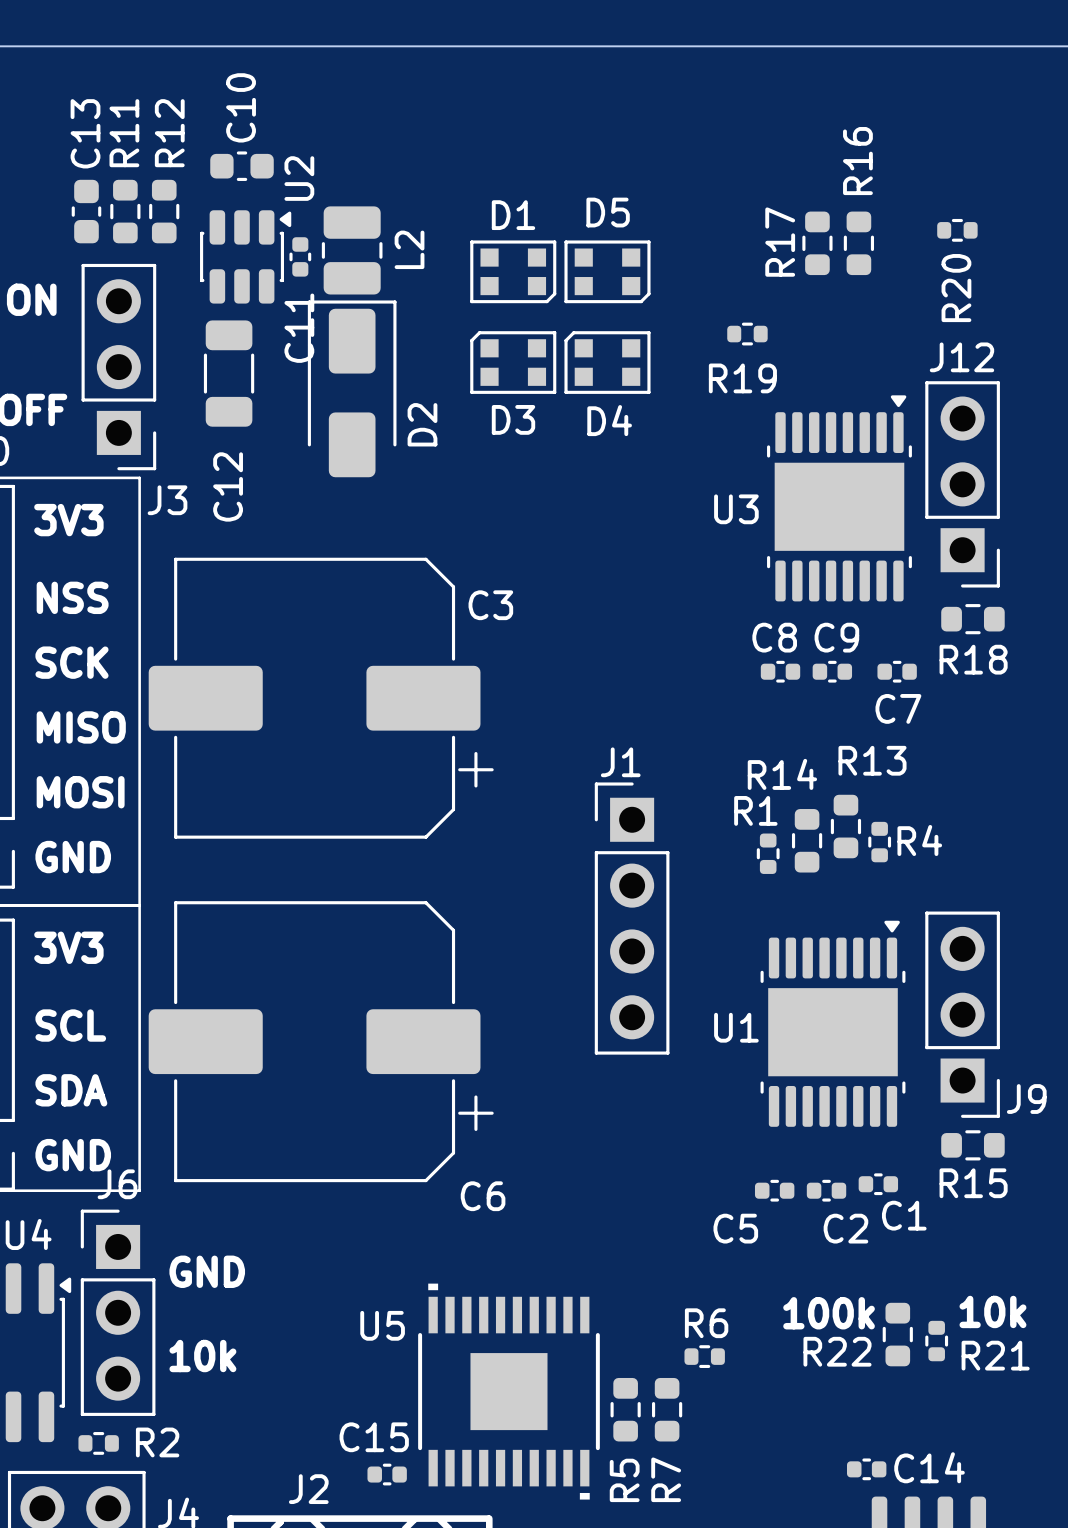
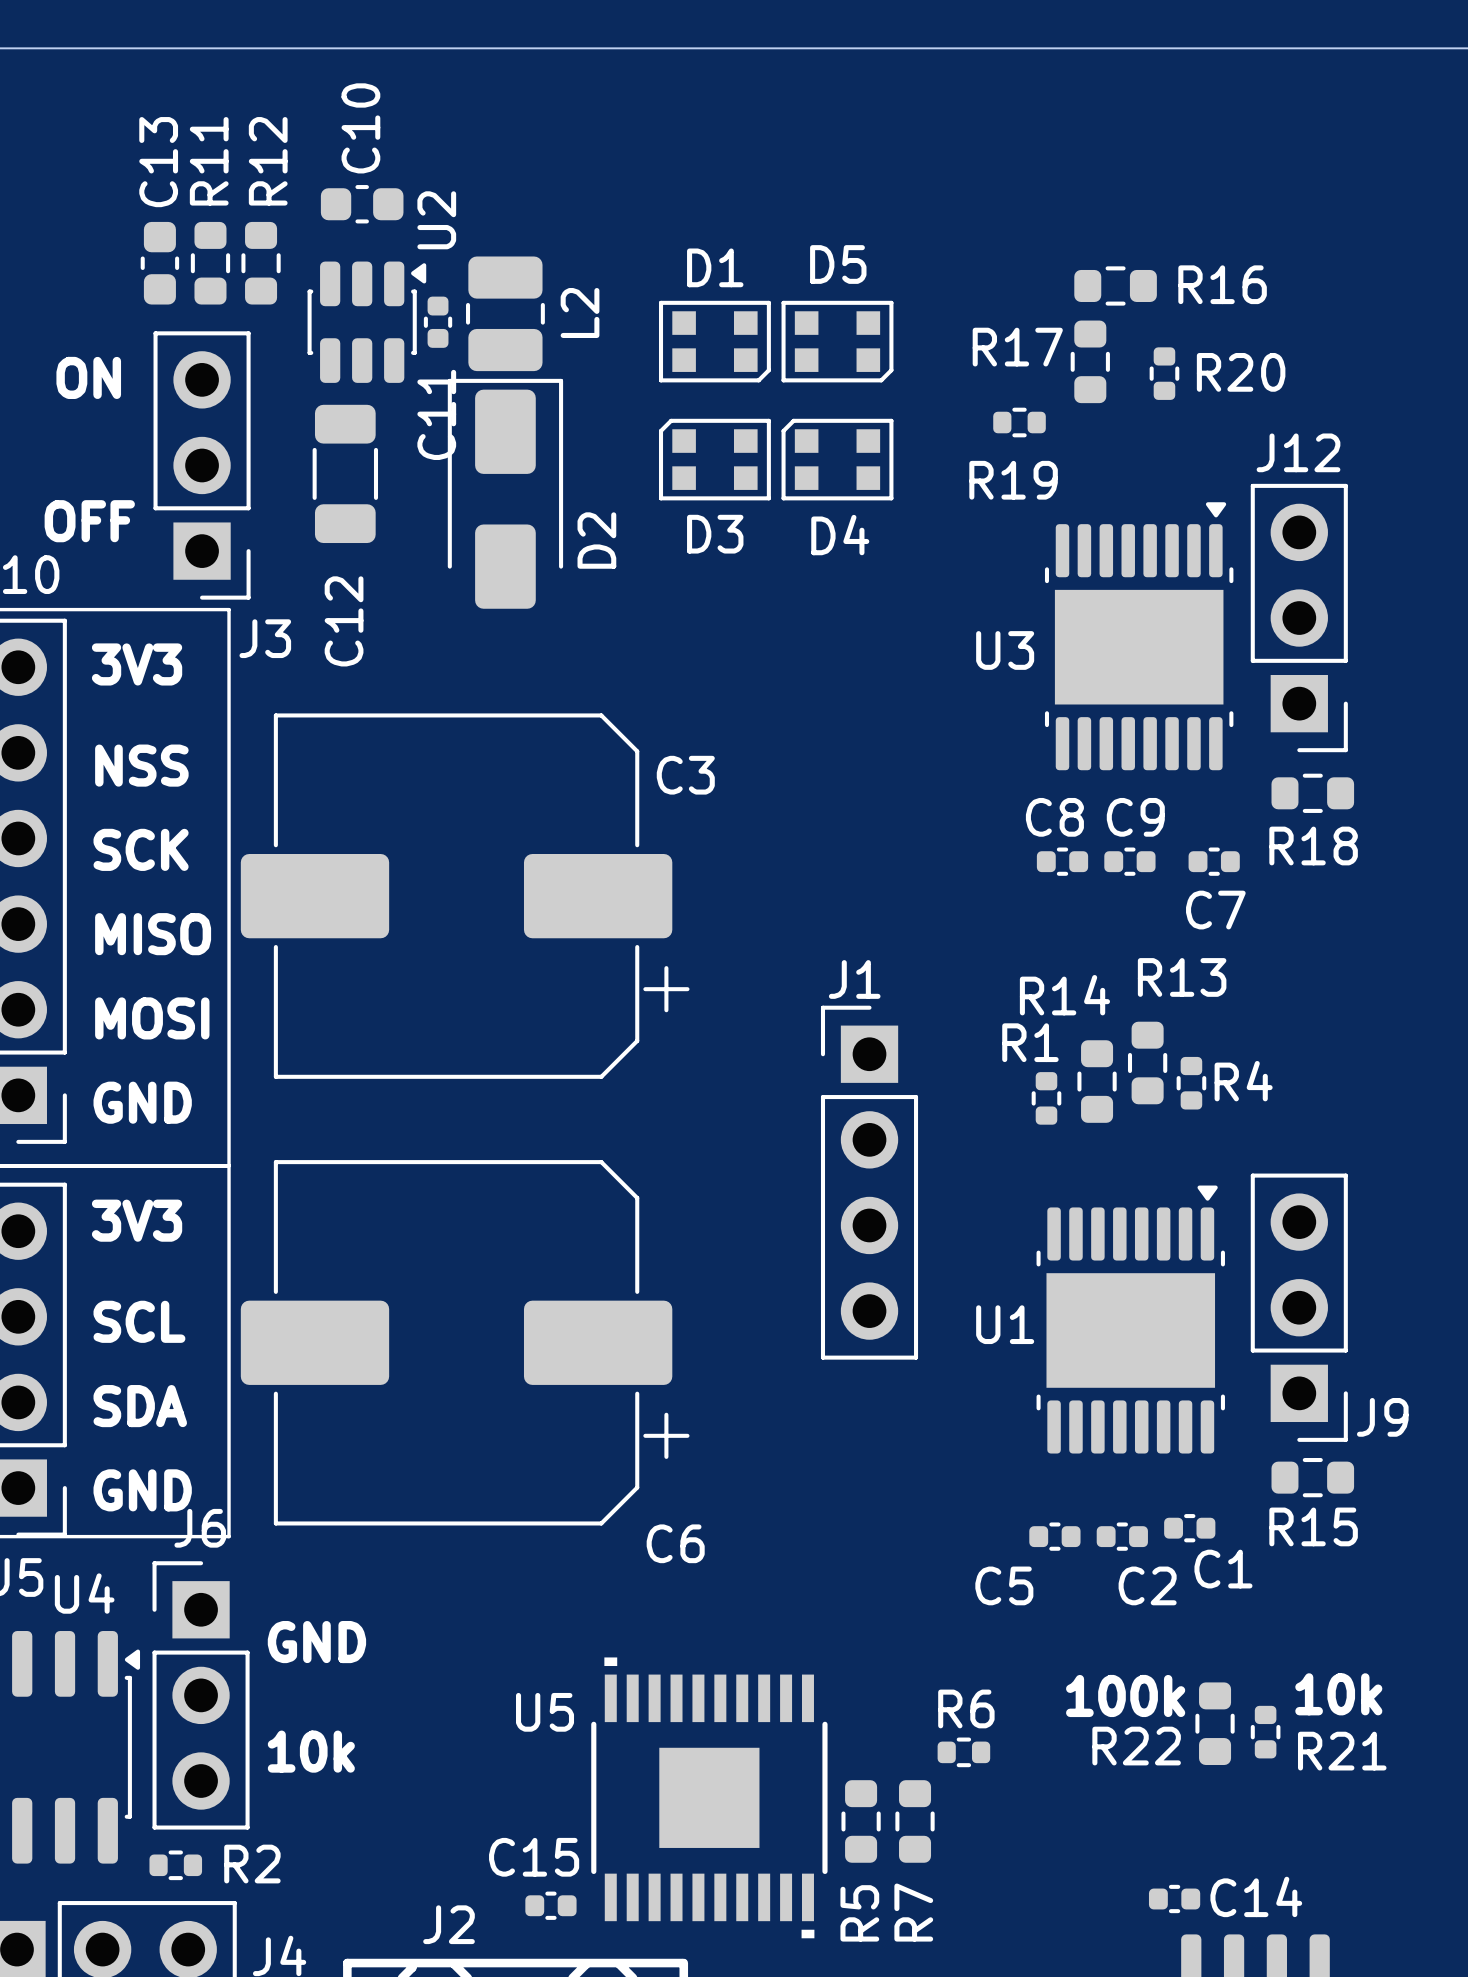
R20 rotation: 0° (957, 230) -> 90° clockwise (1164, 373)
R20 position: (957, 230) -> (1164, 373)
R17 name rotation: 0° (780, 242) -> 90° clockwise (1017, 347)
R17 position: (817, 243) -> (1090, 361)
R16 rotation: 0° (858, 243) -> 90° clockwise (1115, 285)
R16 position: (858, 243) -> (1115, 285)
R20 name position: R20 (956, 288) -> R20 (1241, 372)

